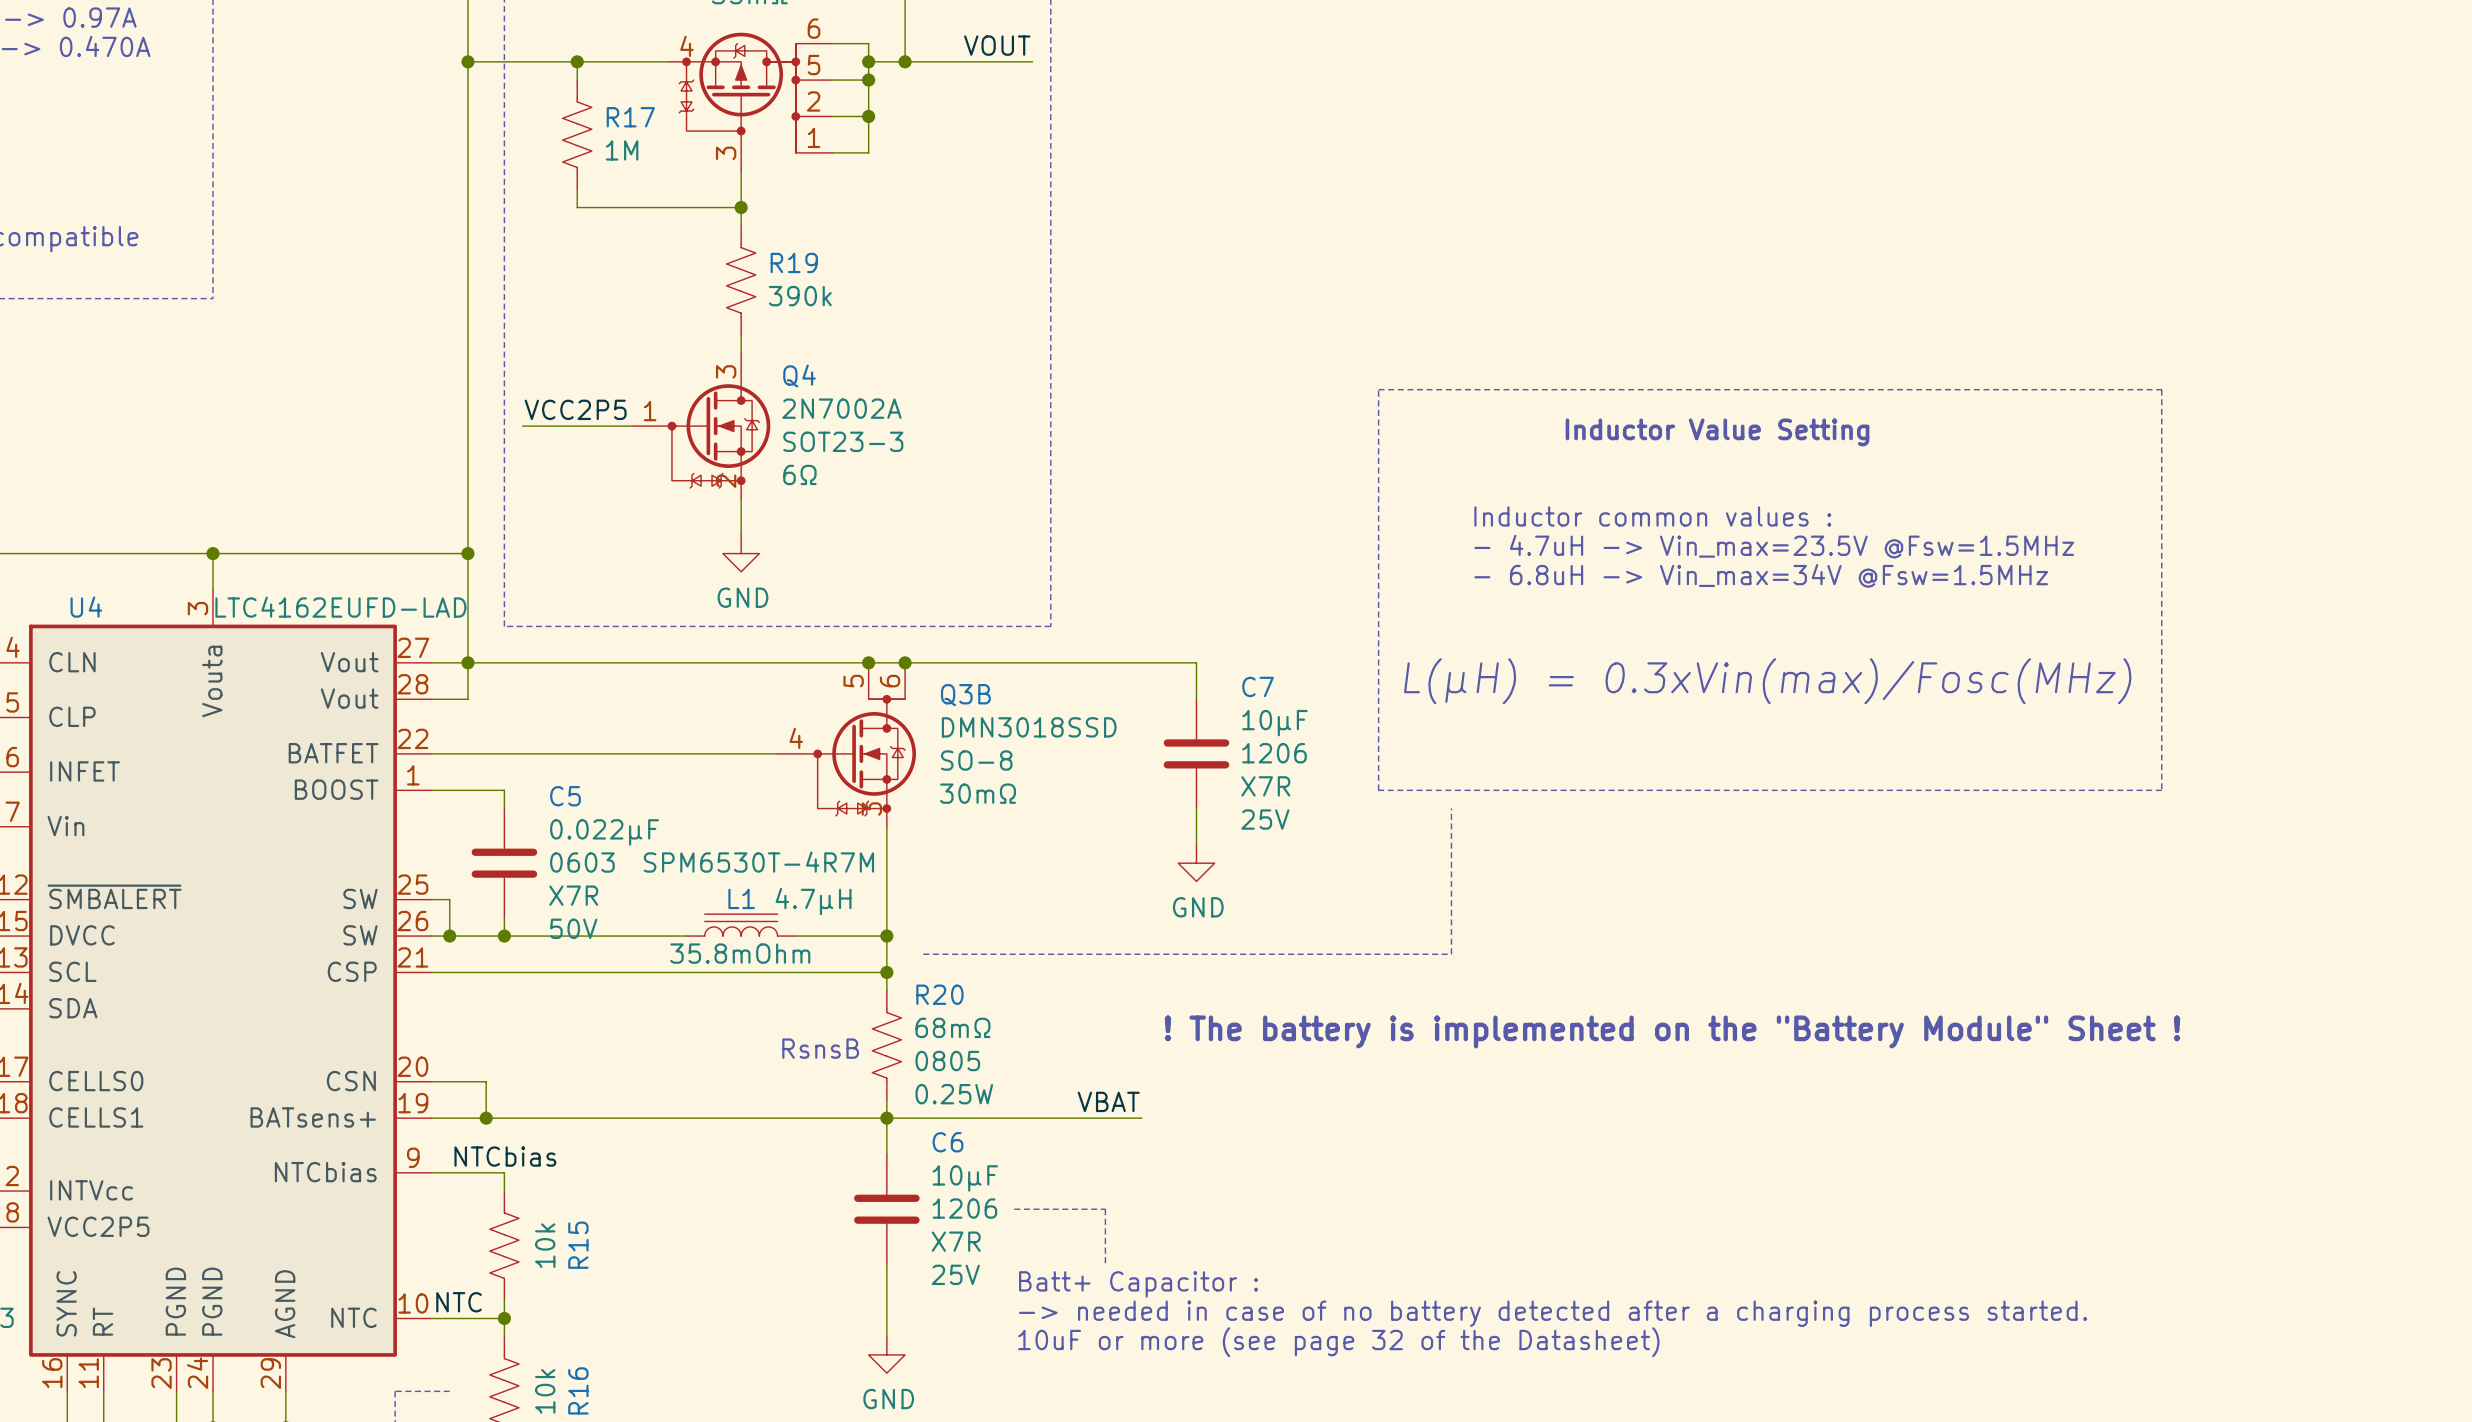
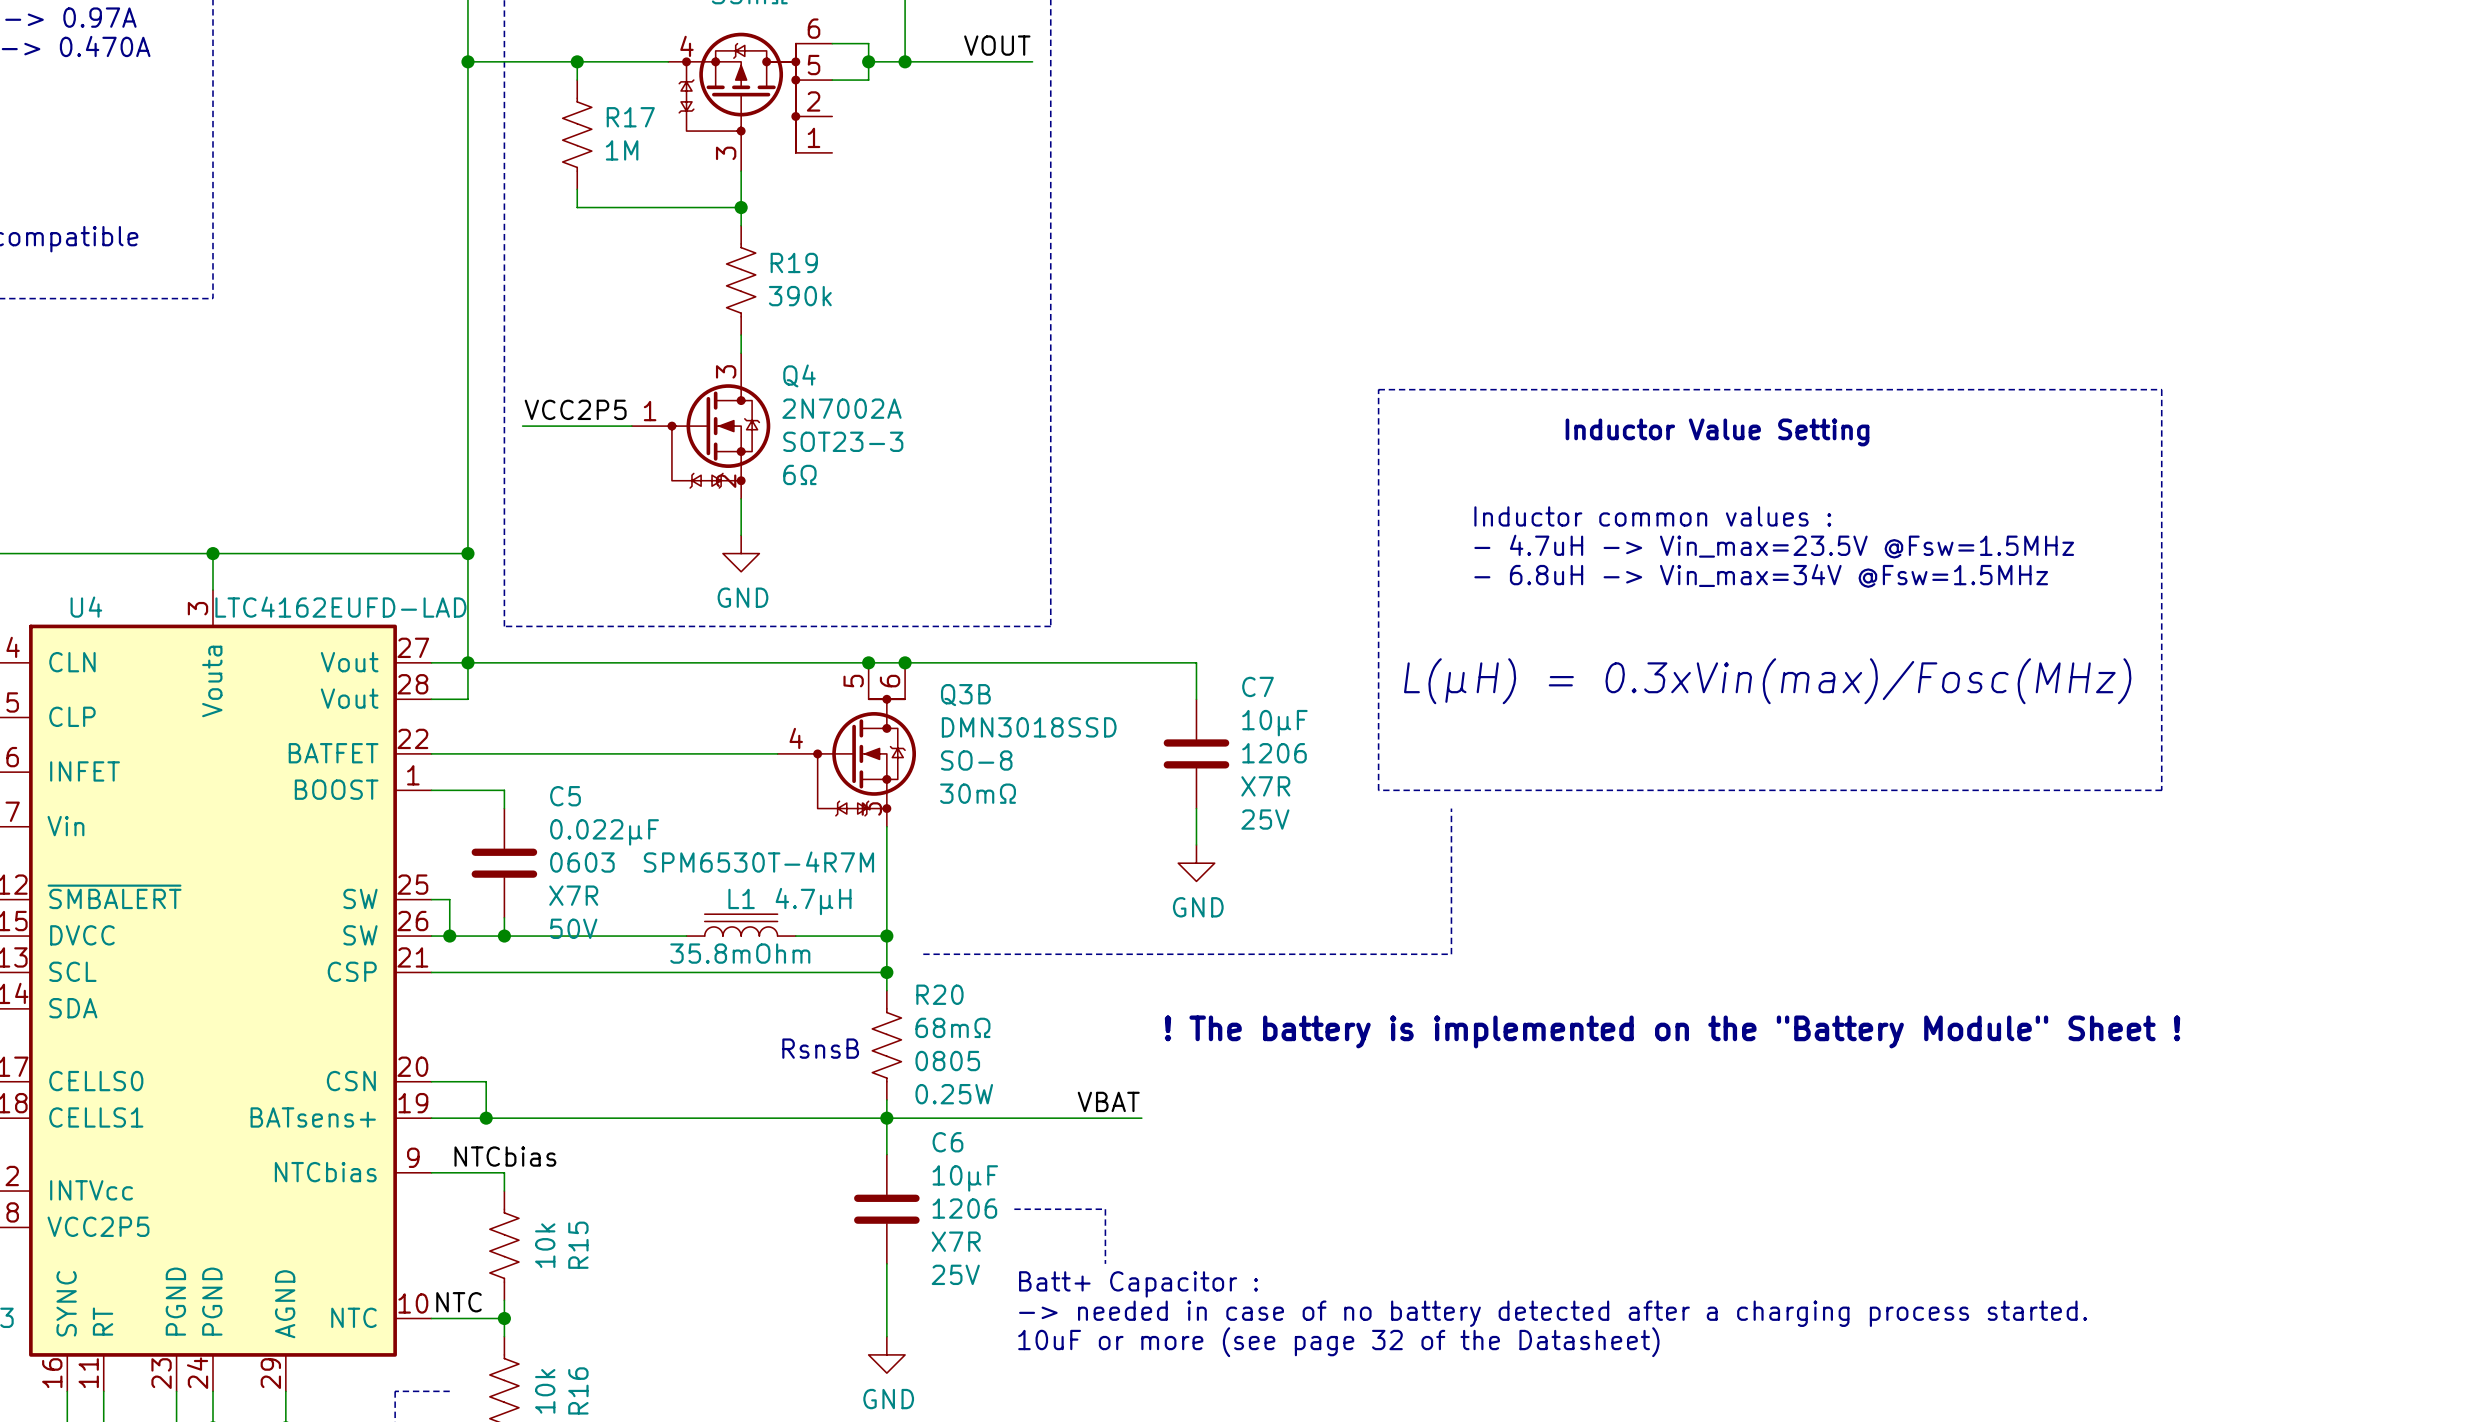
wire: (868, 80) (868, 152) (832, 152) -> none
junction: (868, 80) -> none
wire: (832, 116) (868, 116) -> none
junction: (868, 116) -> none

